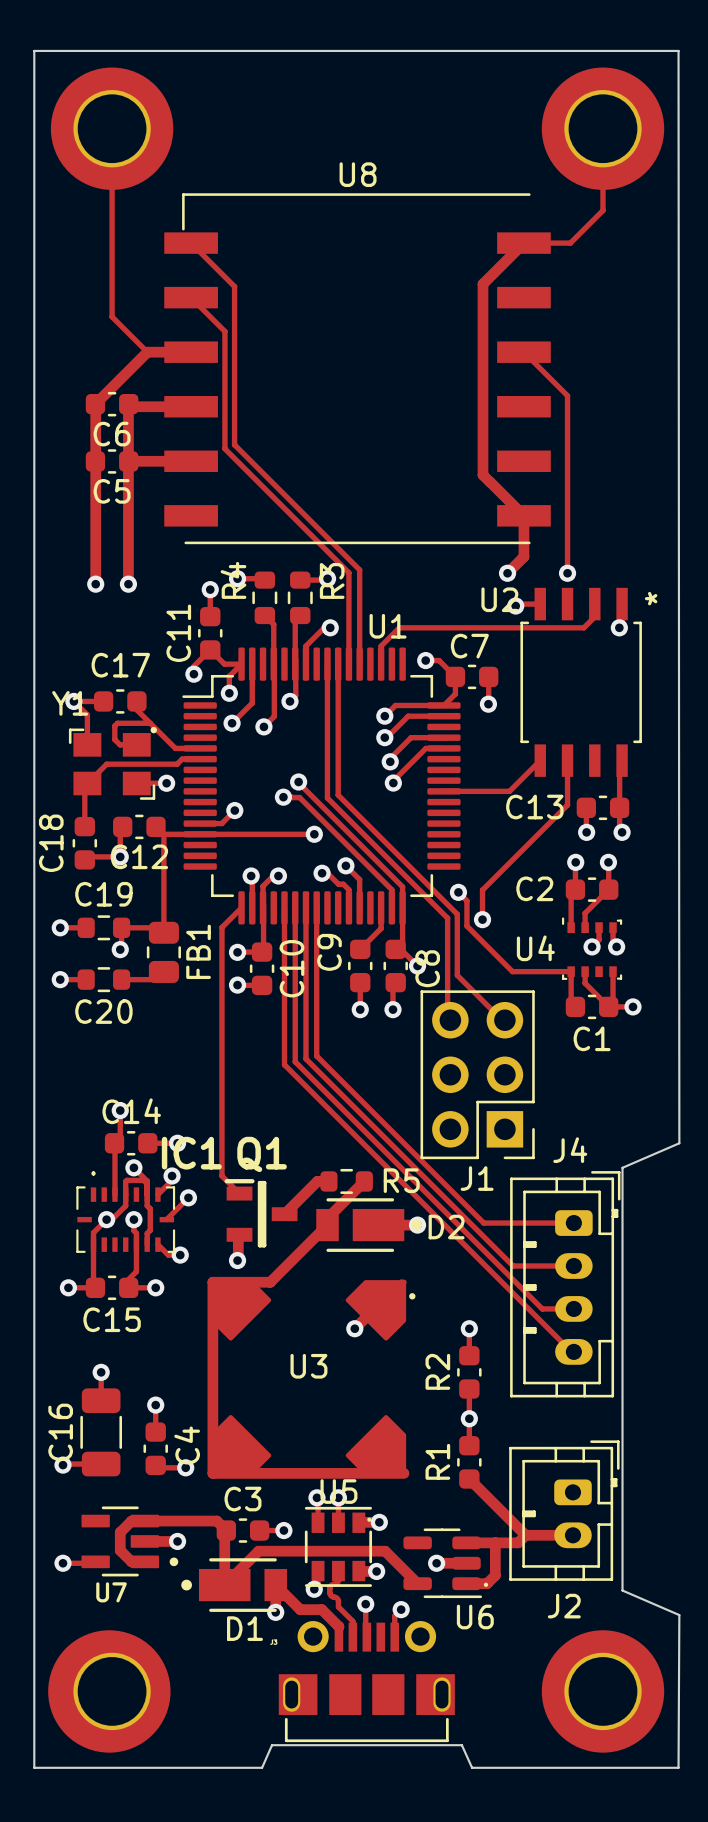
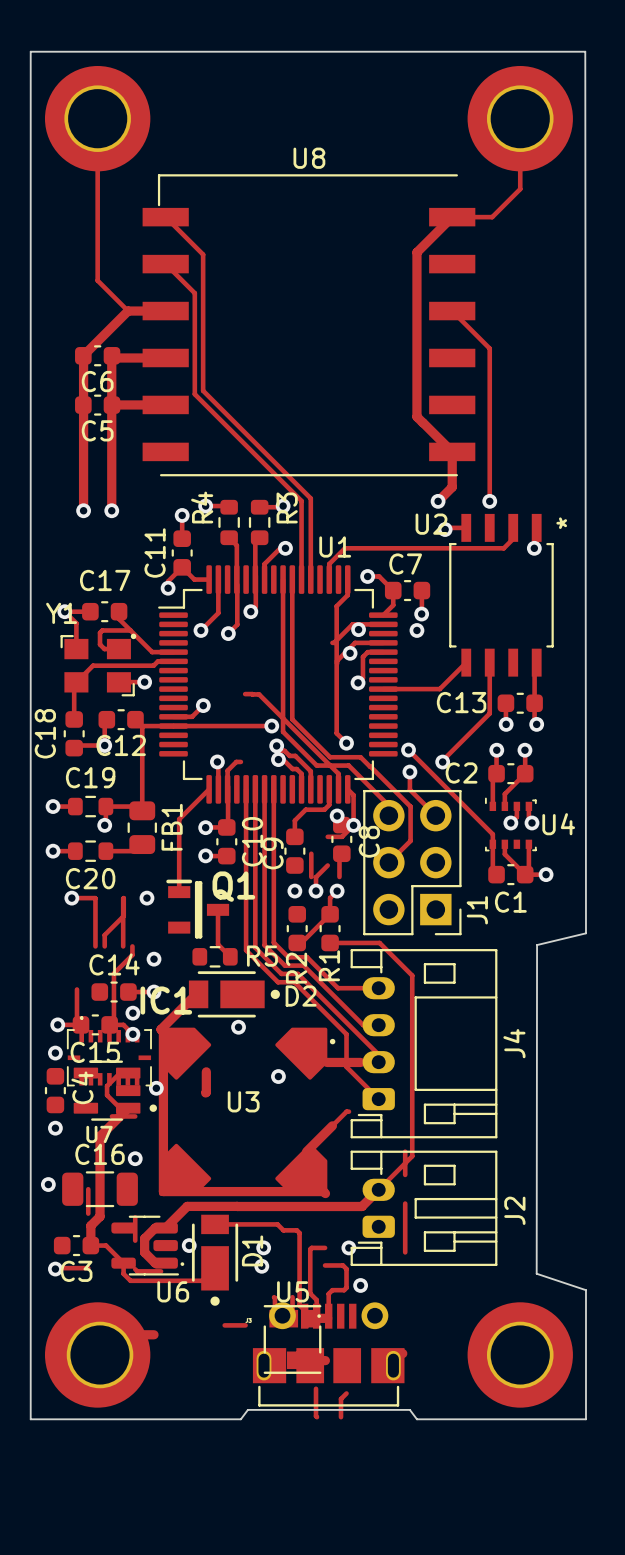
board edge: (678, 50) (679, 1143) (622, 1167) (622, 1590) (679, 1615) (678, 1767) (472, 1767) (461, 1745) (272, 1745) (262, 1767) (34, 1767) (34, 1639) -> (585, 51) (585, 933) (537, 945) (536, 1273) (585, 1290) (585, 1419) (416, 1419) (409, 1409) (247, 1409) (240, 1419) (30, 1419)
track: (241, 664) (229, 676) (229, 693) -> none
track: none -> (347, 579) (347, 595) (336, 606) (336, 733) (346, 743)
via: (229, 693) -> none
track: (443, 705) (395, 705) (384, 716) -> none
via: (384, 716) -> none
via: none -> (358, 629)
via: none -> (416, 630)
via: (384, 737) -> none
track: (420, 754) (393, 783) -> (362, 656) (362, 677) (358, 682)
via position: (390, 761) -> (350, 653)
track: (298, 782) (402, 886) (402, 942) (395, 949) (400, 949) (417, 966) -> none
via: (298, 782) -> none
via: (393, 783) -> none
via: none -> (358, 682)
track: (338, 795) (457, 914) (457, 975) (502, 1020) -> (292, 692) (292, 719) (330, 757) (360, 757) (410, 806) (410, 840) (388, 862)
via: (283, 797) -> none
track: (327, 798) (447, 918) (447, 1020) -> (283, 694) (283, 731) (316, 765) (348, 765) (388, 805) (388, 815)
track: (567, 805) (482, 890) (482, 919) -> (489, 700) (489, 713) (442, 762)
via: none -> (346, 743)
via: none -> (276, 745)
via: none -> (408, 750)
track: (345, 865) (359, 879) (359, 886) -> (276, 745) (289, 755) (295, 755) (310, 771)
via: (345, 865) -> none
via: (278, 876) -> none
via: none -> (442, 762)
track: none -> (409, 772) (409, 789) (435, 815)
track: (458, 892) (466, 900) (466, 926) (512, 971) (571, 971) -> (408, 750) (492, 834) (492, 844)
via position: (458, 892) -> (409, 772)
track: none -> (347, 789) (353, 795) (353, 825) (342, 836) (327, 836)
via: (482, 919) -> none
track: (381, 925) (381, 928) (360, 949) -> (329, 804) (324, 809) (305, 809) (294, 820) (294, 836)
track: (221, 927) (221, 1176) (239, 1193) -> (192, 806) (179, 819) (179, 892)
via: none -> (337, 815)
U4 name position: U4 (535, 948) -> U4 (558, 824)
C9 name position: C9 (329, 952) -> C9 (273, 853)
C9 position: (360, 966) -> (294, 851)
via position: (417, 966) -> (353, 825)
track: none -> (327, 865) (316, 877) (316, 891)
via position: (360, 1009) -> (316, 891)
via position: (392, 1009) -> (337, 891)
via: none -> (294, 891)
track: none -> (337, 891) (330, 898) (330, 914) (301, 942) (297, 942)
track: none -> (71, 898) (95, 898) (95, 946)
via: none -> (71, 898)
via: none -> (146, 898)
track: none -> (218, 909) (218, 944) (230, 956)
track: (316, 1055) (483, 1223) (573, 1223) -> (273, 916) (273, 942) (288, 957) (307, 957) (338, 988) (378, 988)
track: (305, 1058) (513, 1266) (573, 1266) -> (264, 919) (264, 945) (284, 965) (303, 965) (363, 1025) (378, 1025)
track: (295, 1061) (542, 1308) (573, 1308) -> (255, 921) (255, 947) (281, 973) (297, 973) (378, 1054) (378, 1062)
track: (284, 1064) (571, 1351) (573, 1351) -> (246, 924) (246, 950) (278, 982) (294, 982) (346, 1034) (346, 1066) (378, 1099)
J1 position: (477, 1074) -> (412, 862)
track: none -> (330, 942) (379, 942) (412, 975) (412, 1156) (362, 1206) (237, 1206)
track: none -> (104, 946) (104, 935) (123, 916) (123, 898) (123, 898) (123, 946)
track: none -> (132, 946) (132, 955) (113, 973) (113, 1020) (109, 1024) (123, 1024) (132, 1034)
via: none -> (154, 959)
track: (120, 1110) (120, 1137) (114, 1143) (114, 1194) -> none
via: (120, 1110) -> none
track: none -> (76, 989) (76, 1020) (80, 1024) (57, 1024)
track: none -> (191, 994) (191, 998) (160, 1029) (163, 1031) (163, 1191) (323, 1191) (325, 1193)
J4 name position: J4 (570, 1150) -> J4 (514, 1043)
Q1 name position: Q1 (262, 1154) -> Q1 (233, 886)
track: (133, 1167) (147, 1181) (147, 1205) (150, 1208) (150, 1230) (147, 1233) (147, 1244) -> none
via: (133, 1167) -> none
via: none -> (132, 1013)
J4 footprint: [510, 1171, 621, 1398] -> [350, 949, 498, 1139]
track: (172, 1176) (172, 1180) (157, 1194) -> none
via: (172, 1176) -> none
J1 name rotation: 0° (477, 1178) -> 90° counterclockwise (477, 910)
J1 name position: J1 (477, 1178) -> J1 (477, 910)
via: none -> (57, 1024)
track: (328, 1181) (317, 1181) (284, 1214) -> none
R5 position: (346, 1181) -> (215, 956)
track: (364, 1181) (327, 1218) (327, 1225) (270, 1282) (212, 1282) (212, 1473) (404, 1473) -> none
track: (147, 1183) (143, 1180) (126, 1180) (125, 1205) (111, 1219) (106, 1219) (93, 1232) (93, 1285) (95, 1287) (68, 1287) -> none
via: none -> (238, 1027)
via: none -> (132, 1034)
track: (188, 1197) (166, 1219) -> none
via: (188, 1197) -> none
Q1 position: (261, 1213) -> (197, 909)
via: none -> (55, 1053)
via: (106, 1219) -> none
track: (133, 1219) (133, 1230) (136, 1233) (136, 1271) (128, 1279) -> none
via: (133, 1219) -> none
D2 position: (369, 1225) -> (234, 994)
via: (417, 1225) -> none
track: none -> (128, 1073) (120, 1073) (107, 1086) (107, 1095) (120, 1108) (128, 1108) (100, 1136) (100, 1216) (90, 1225) (90, 1245) (106, 1245) (123, 1263) (123, 1273) (130, 1280) (202, 1280) (215, 1268)
via: none -> (278, 1076)
track: (157, 1244) (168, 1255) (180, 1255) -> none
via: (237, 1260) -> none
via position: (68, 1287) -> (55, 1128)
C15 position: (112, 1287) -> (95, 1024)
via: (155, 1287) -> none
via: (354, 1328) -> none
via: (469, 1328) -> none
via: none -> (135, 1158)
via: none -> (48, 1184)
R2 name position: R2 (437, 1371) -> R2 (296, 968)
via: (101, 1372) -> none
R2 position: (469, 1372) -> (297, 928)
U3 position: (313, 1377) -> (247, 1111)
track: none -> (237, 1206) (187, 1206) (165, 1228) (155, 1228) (144, 1238) (144, 1252) (155, 1263) (165, 1263)
via: (155, 1405) -> none
track: none -> (215, 1224) (277, 1224) (283, 1230) (296, 1230) (299, 1233) (299, 1305) (304, 1310) (304, 1316)
via: (469, 1418) -> none
C16 rotation: 0° (101, 1432) -> 90° clockwise (100, 1189)
C16 position: (101, 1432) -> (100, 1189)
via: none -> (189, 1245)
via: none -> (263, 1247)
track: none -> (325, 1247) (310, 1249) (310, 1293) (316, 1300) (316, 1316)
via: none -> (348, 1247)
J2 footprint: [509, 1440, 620, 1581] -> [350, 1150, 498, 1266]
C4 position: (155, 1448) -> (55, 1090)
track: none -> (325, 1265) (342, 1265) (346, 1269) (346, 1287) (344, 1290) (332, 1290) (328, 1293) (328, 1316)
via: none -> (261, 1266)
R1 name position: R1 (437, 1461) -> R1 (329, 965)
R1 position: (469, 1462) -> (330, 928)
via: (185, 1467) -> none
track: (469, 1479) (525, 1535) -> none
via: none -> (360, 1285)
via: (316, 1497) -> none
via: (338, 1497) -> none
C3 name position: C3 (242, 1499) -> C3 (76, 1271)
via: (379, 1522) -> none
C3 position: (242, 1530) -> (76, 1245)
via: (283, 1530) -> none
track: (525, 1535) (572, 1535) -> none
track: (525, 1535) (518, 1542) (466, 1542) -> none
U7 position: (129, 1541) -> (115, 1090)
via: (177, 1541) -> none
track: (495, 1542) (495, 1575) (487, 1583) (466, 1583) -> none
track: (144, 1561) (131, 1561) (120, 1550) (120, 1532) (131, 1521) (216, 1521) (226, 1530) (224, 1532) (224, 1585) (258, 1551) (385, 1551) (417, 1583) -> none
via: (62, 1563) -> none
via: (436, 1563) -> none
U6 position: (445, 1563) -> (147, 1245)
track: (338, 1571) (338, 1581) (330, 1586) (330, 1593) (337, 1598) (338, 1606) (352, 1621) (352, 1637) -> none
via: (376, 1571) -> none
D1 rotation: 0° (234, 1585) -> 90° counterclockwise (215, 1260)
D1 position: (234, 1585) -> (215, 1260)
via: (314, 1589) -> none
via: (365, 1604) -> none
J2 name position: J2 (564, 1606) -> J2 (514, 1210)
via: (401, 1609) -> none
track: (275, 1612) (275, 1585) (300, 1609) (321, 1609) (338, 1626) -> none
via: (275, 1612) -> none
part position: (366, 1681) -> (328, 1354)
part position: (109, 1691) -> (97, 1354)
part position: (602, 1691) -> (520, 1354)

